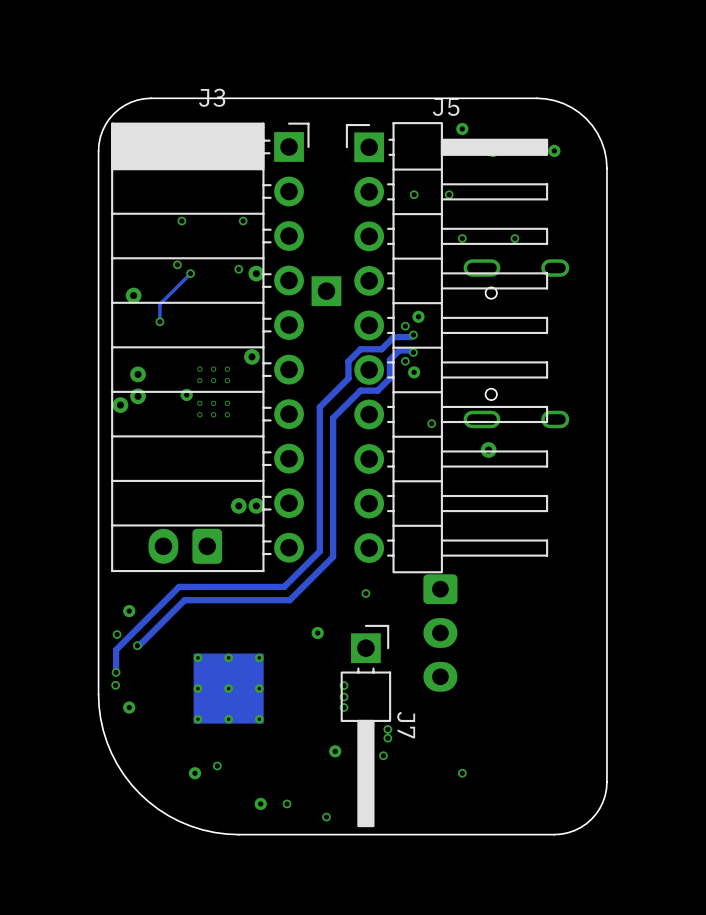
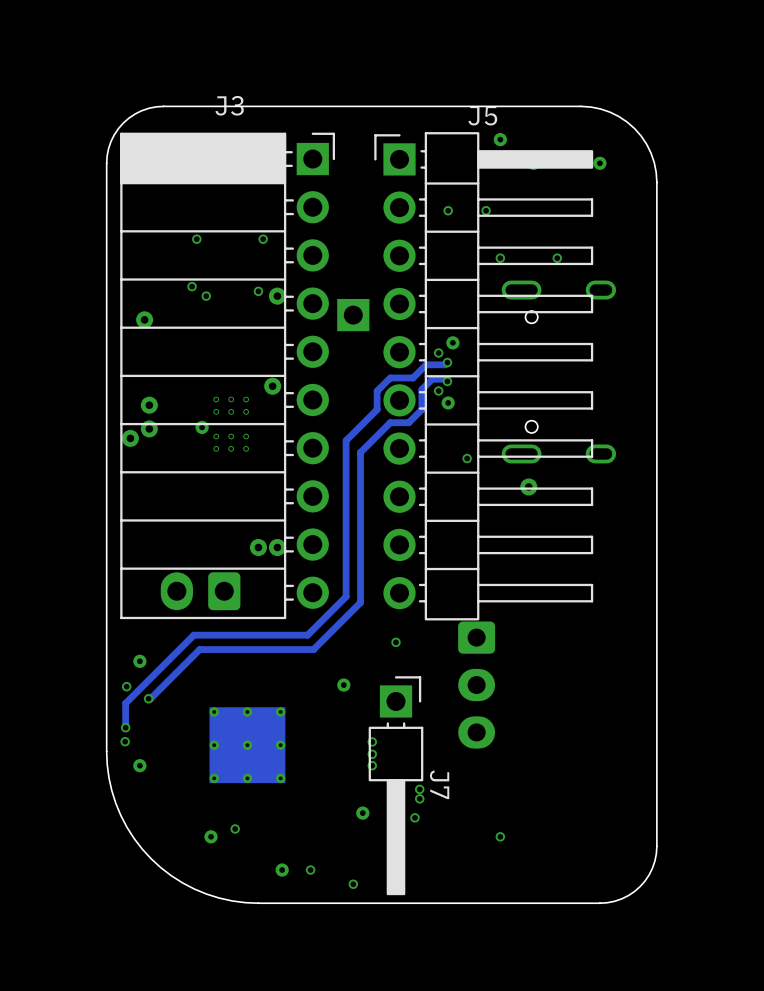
track: (190, 273) (159, 304) (159, 321) -> none
via: (159, 321) -> none

